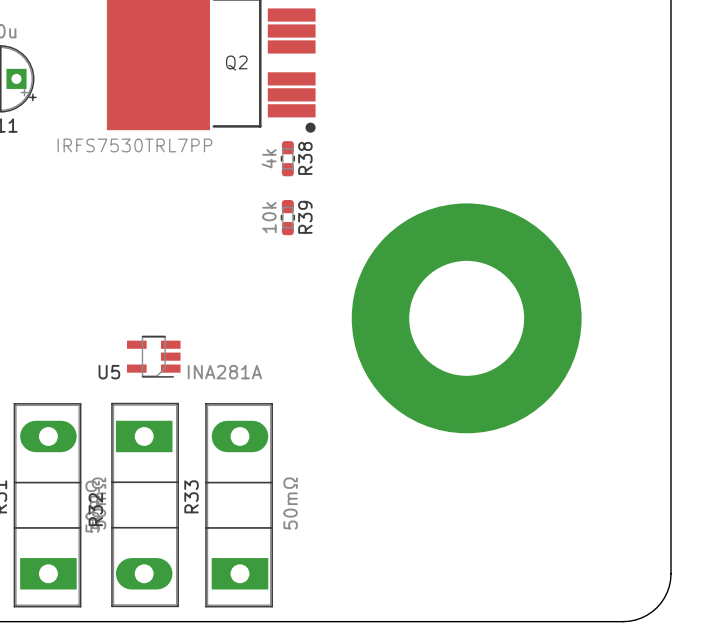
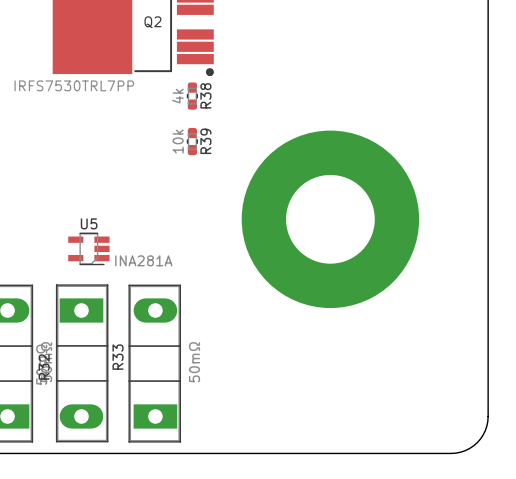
U5 name position: U5 (109, 372) -> U5 (89, 223)

